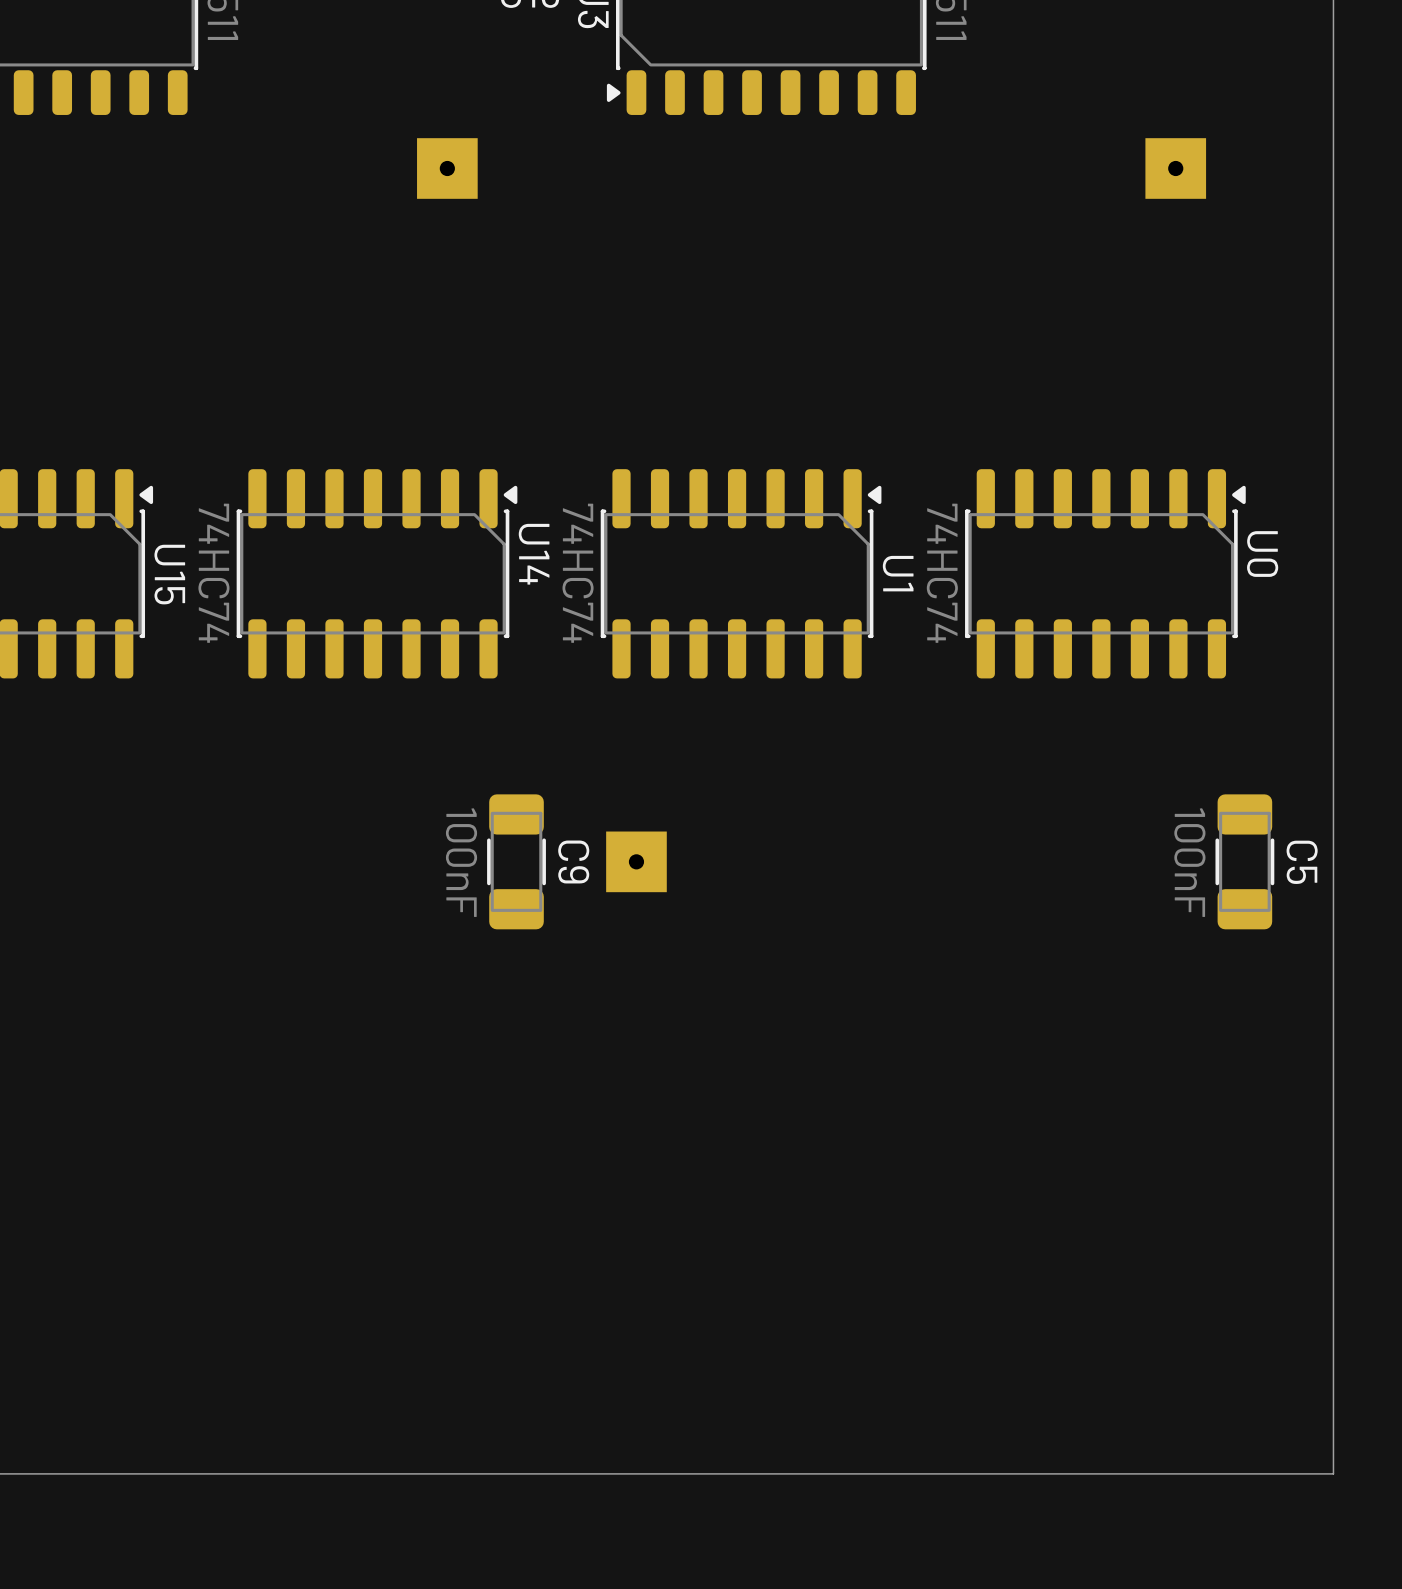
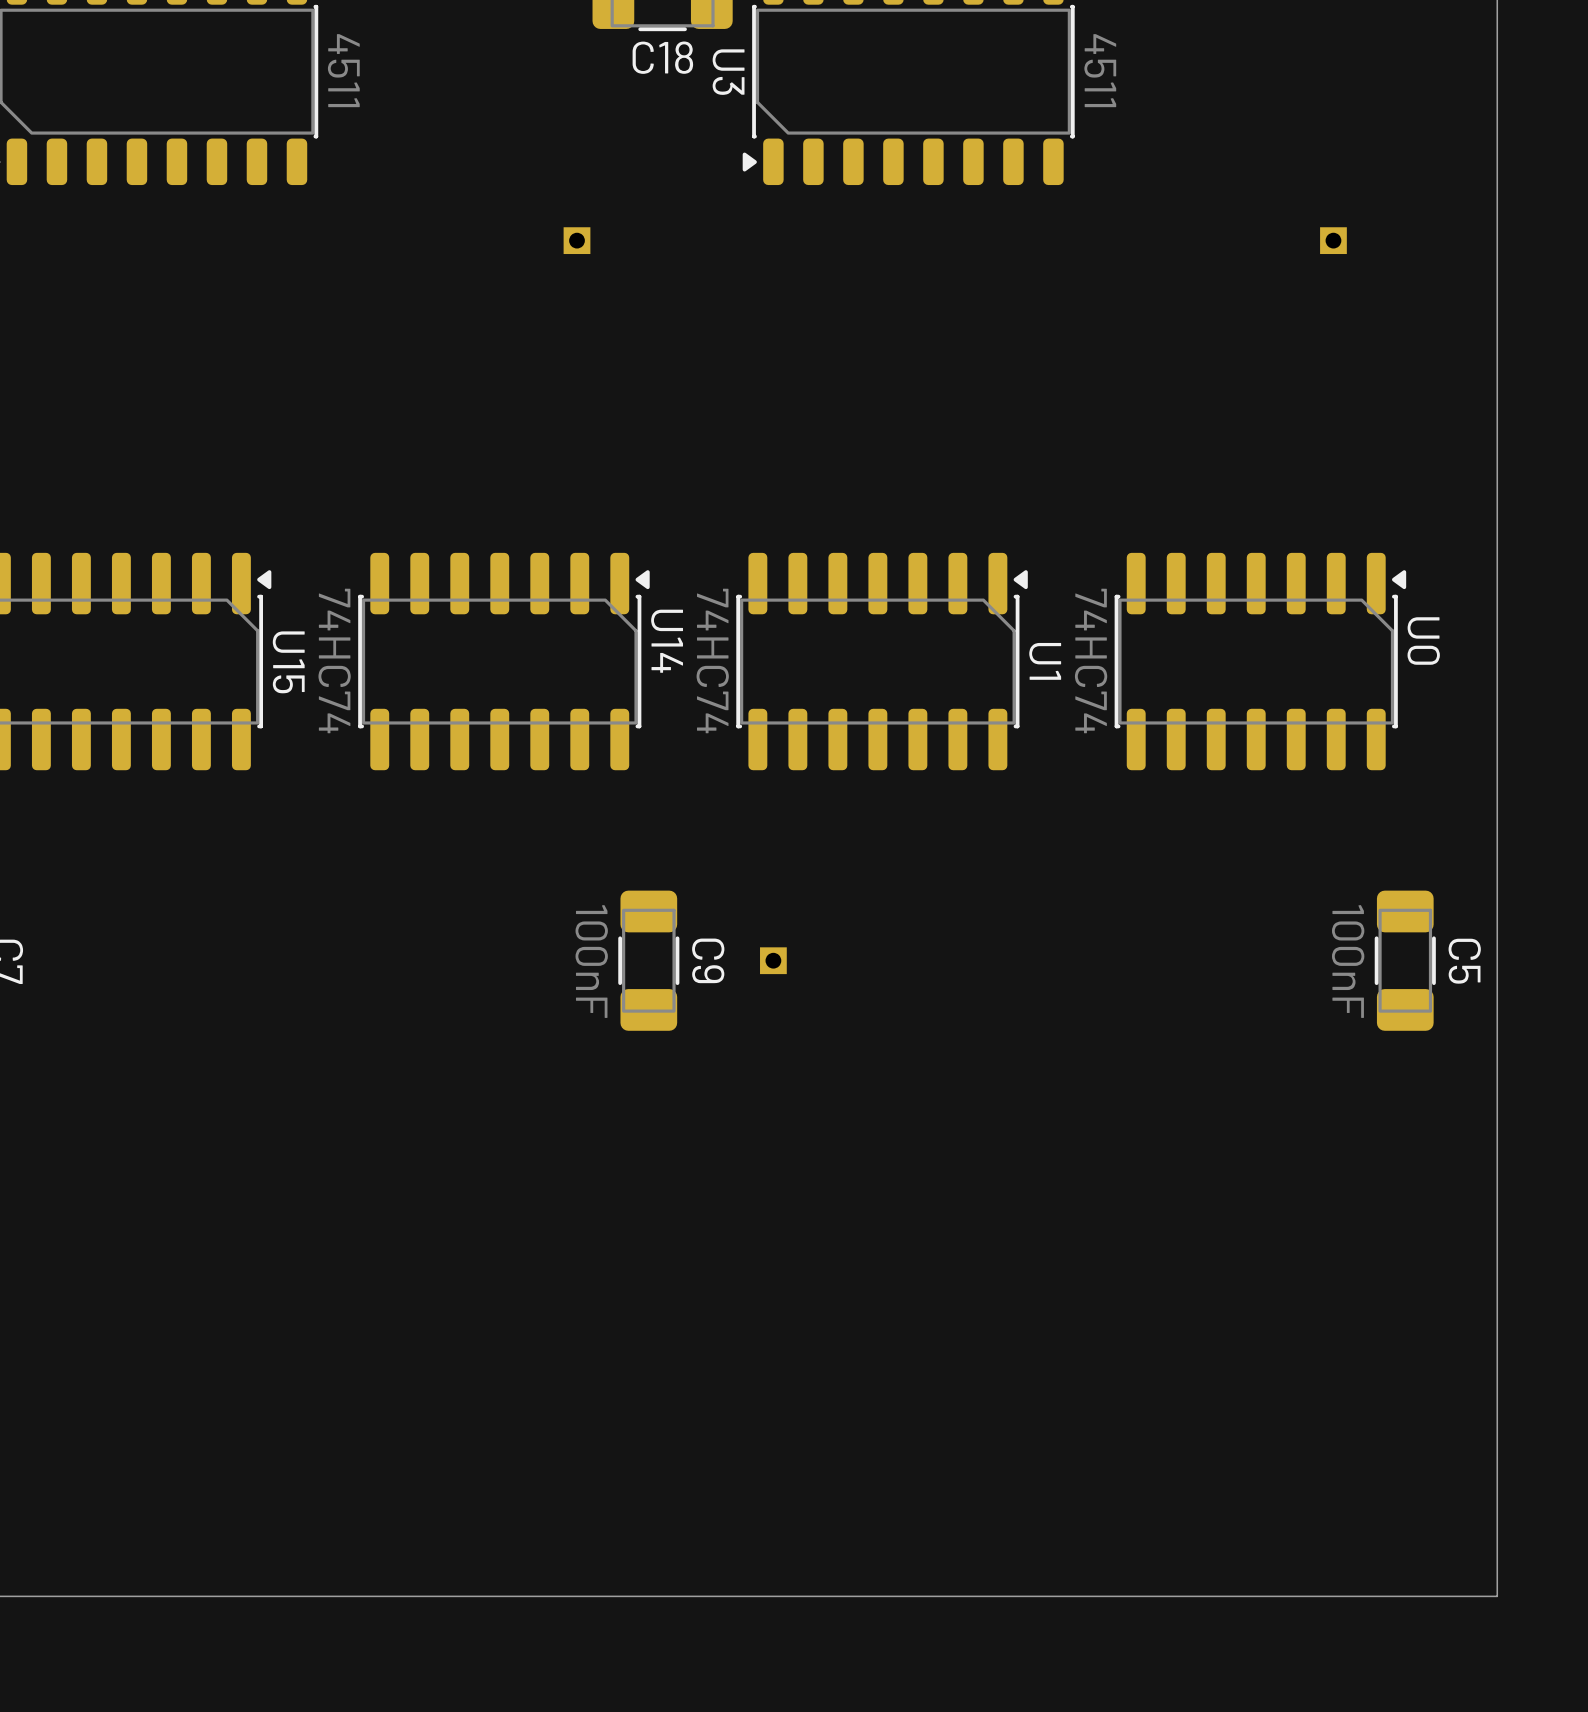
part footprint: [417, 138, 478, 199] -> [563, 227, 591, 255]
part footprint: [1145, 138, 1207, 199] -> [1320, 227, 1347, 255]
part footprint: [606, 831, 667, 893] -> [760, 947, 787, 975]

